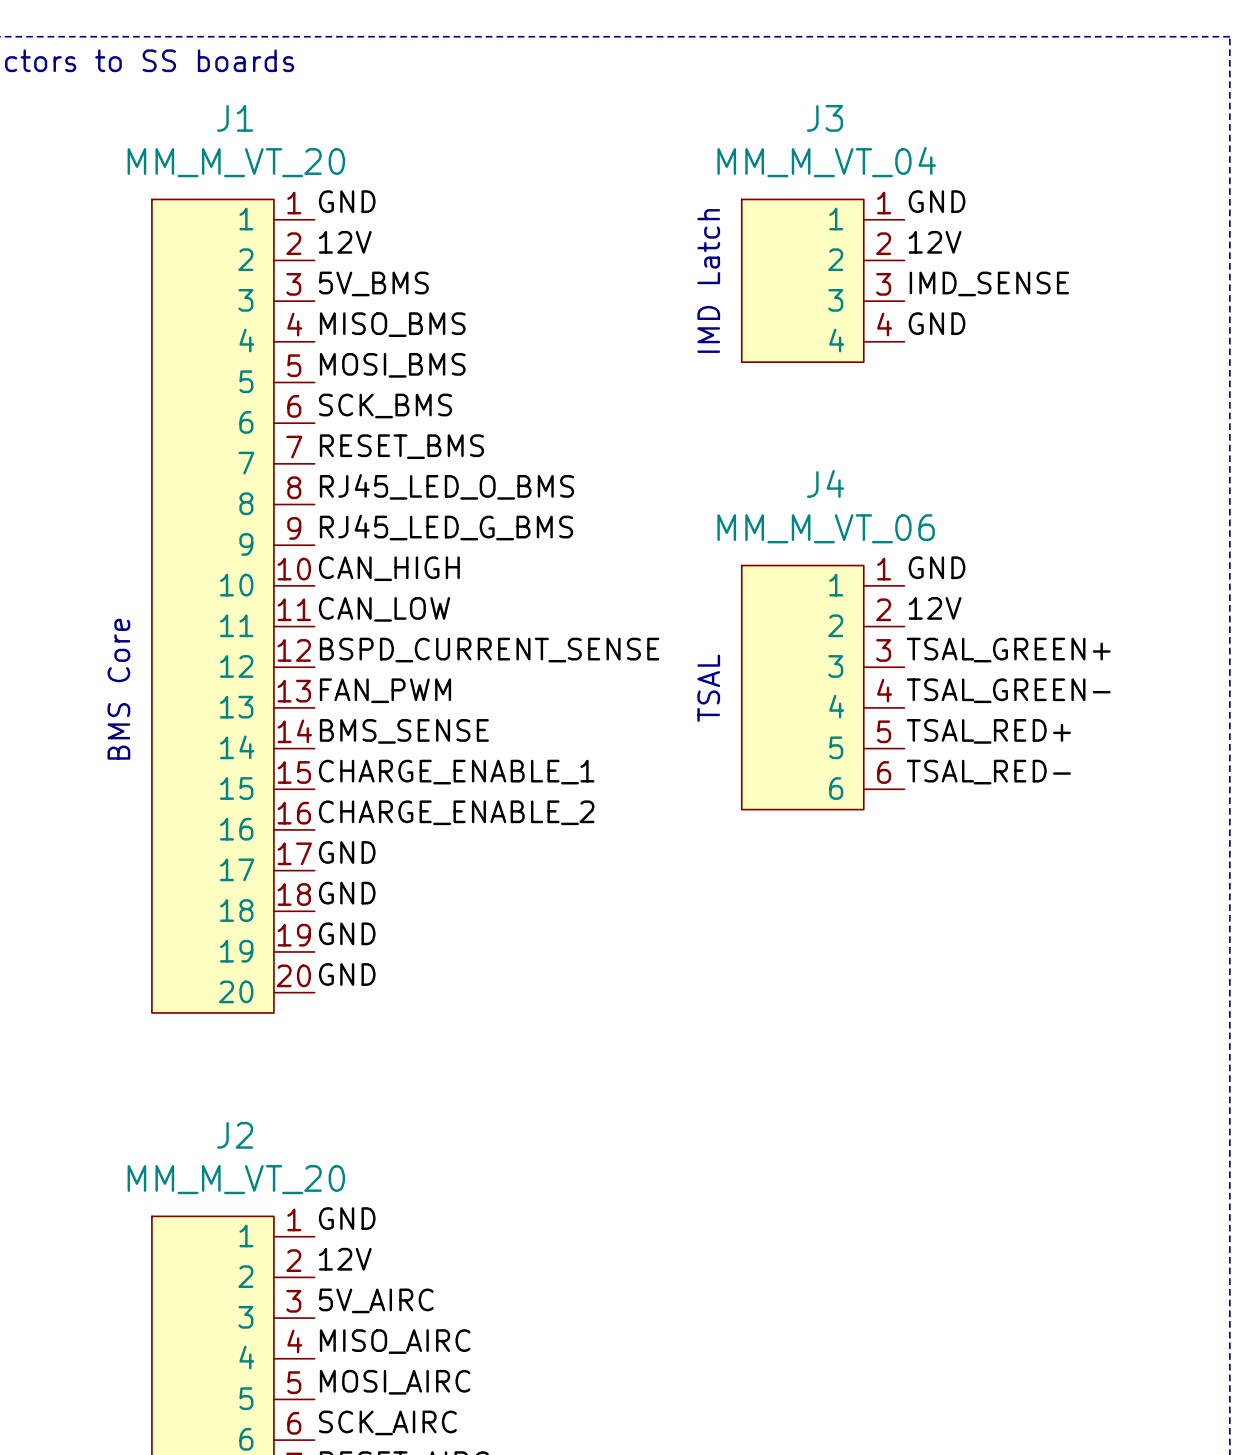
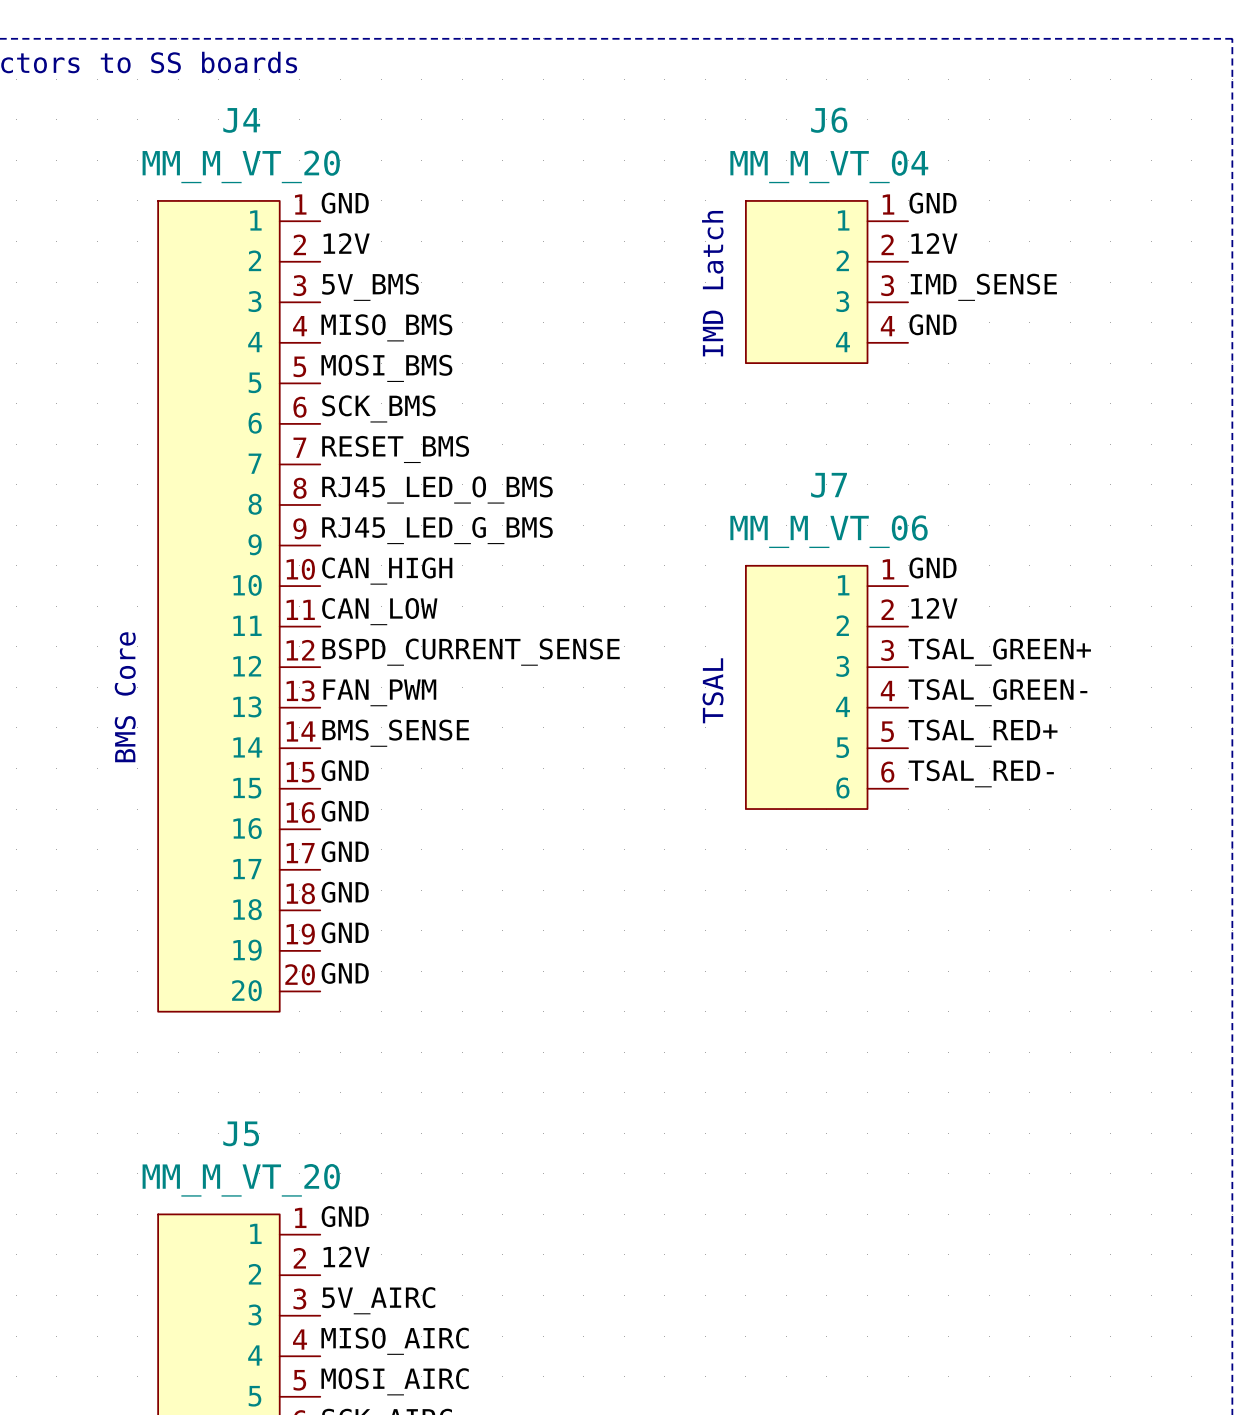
J1 name: J1 (235, 118) -> J4 (241, 120)
J3 name: J3 (824, 118) -> J6 (829, 120)
J4 name: J4 (825, 483) -> J7 (829, 485)
label: CHARGE_ENABLE_1 (456, 772) -> GND (345, 770)
label: CHARGE_ENABLE_2 (456, 812) -> GND (345, 811)
J2 name: J2 (235, 1135) -> J5 (241, 1133)

